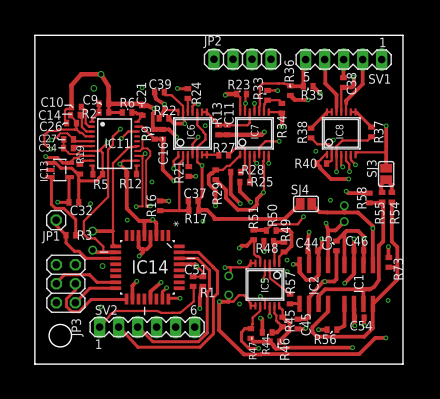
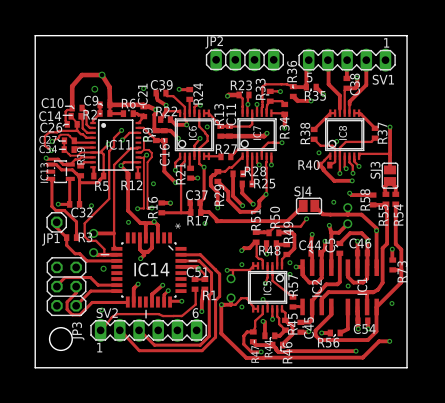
track: (344, 233) (344, 265) -> (366, 267) (366, 278) (363, 282) (353, 282) (347, 276) (347, 267)
track: (353, 265) (353, 273) (344, 283) -> none
via: (324, 281) -> none

